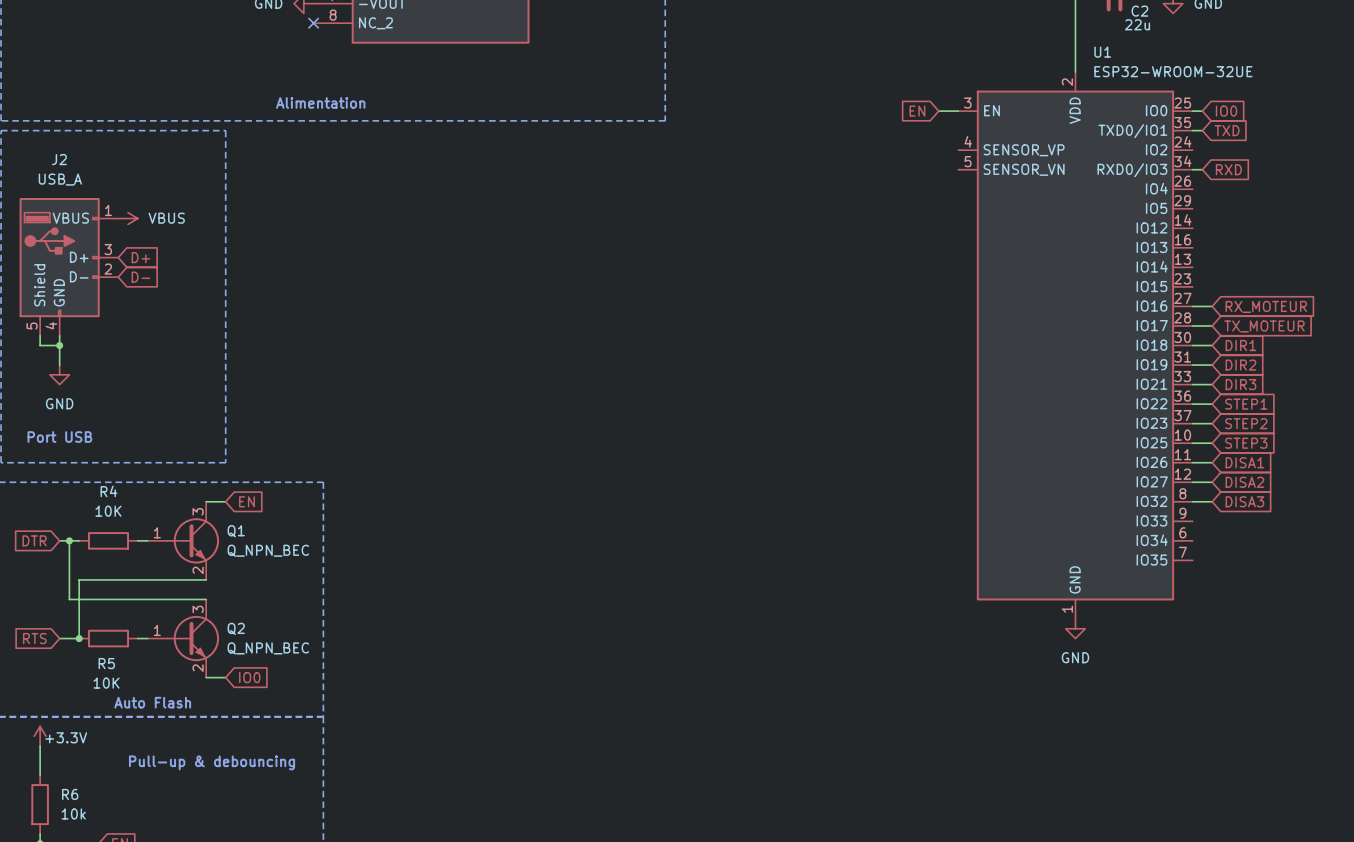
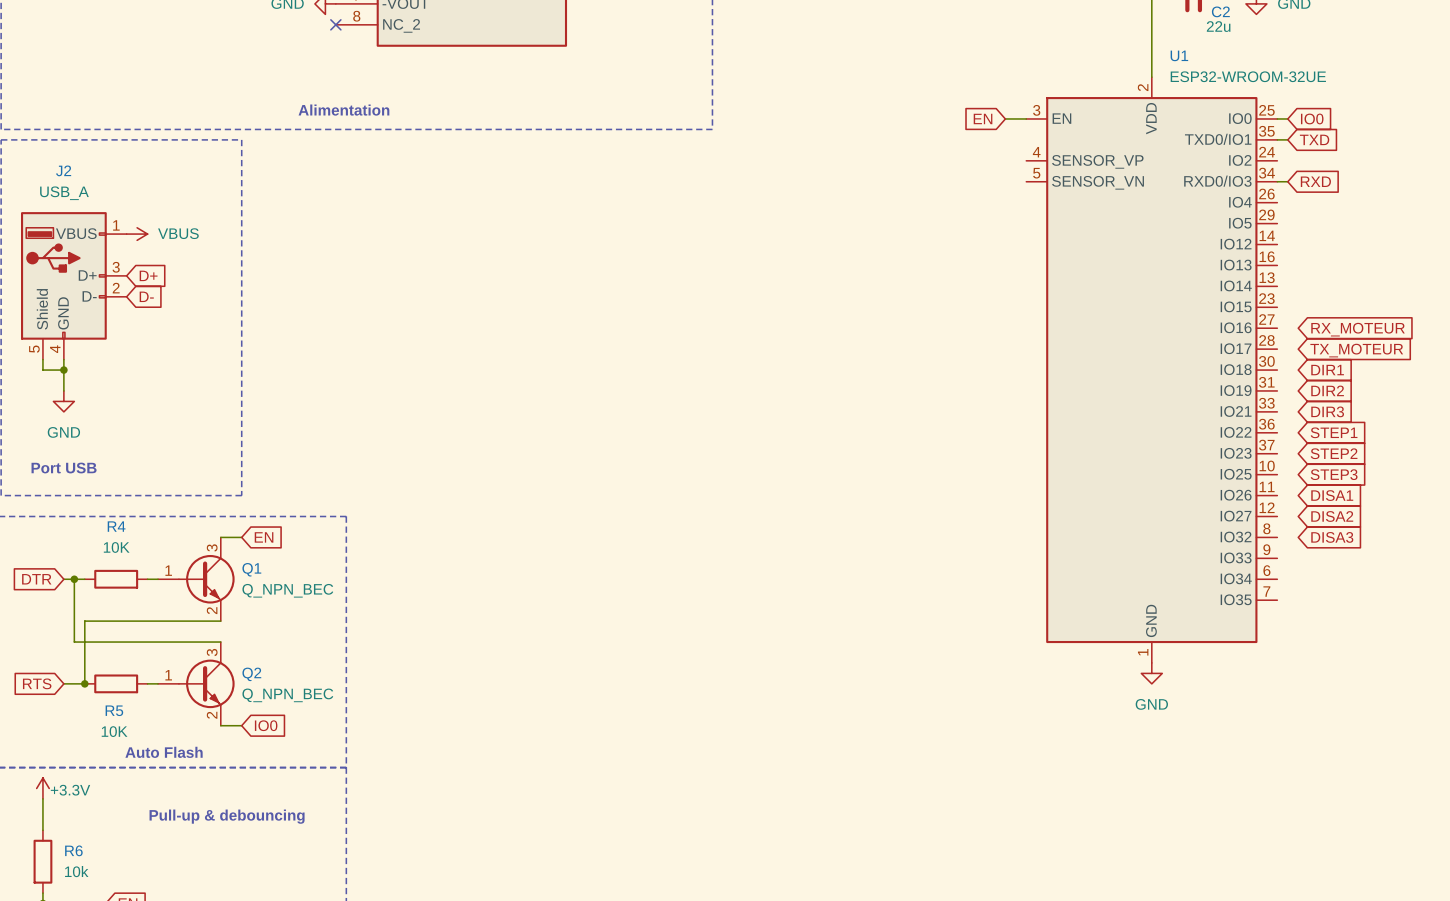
wire: (1192, 306) (1212, 306) -> none
wire: (1192, 325) (1212, 325) -> none
wire: (1192, 345) (1212, 345) -> none
wire: (1192, 365) (1212, 365) -> none
wire: (1192, 384) (1212, 384) -> none
wire: (1192, 404) (1212, 404) -> none
wire: (1192, 423) (1212, 423) -> none
wire: (1192, 443) (1212, 443) -> none
wire: (1192, 462) (1212, 462) -> none
wire: (1192, 482) (1212, 482) -> none
wire: (1192, 501) (1212, 501) -> none

